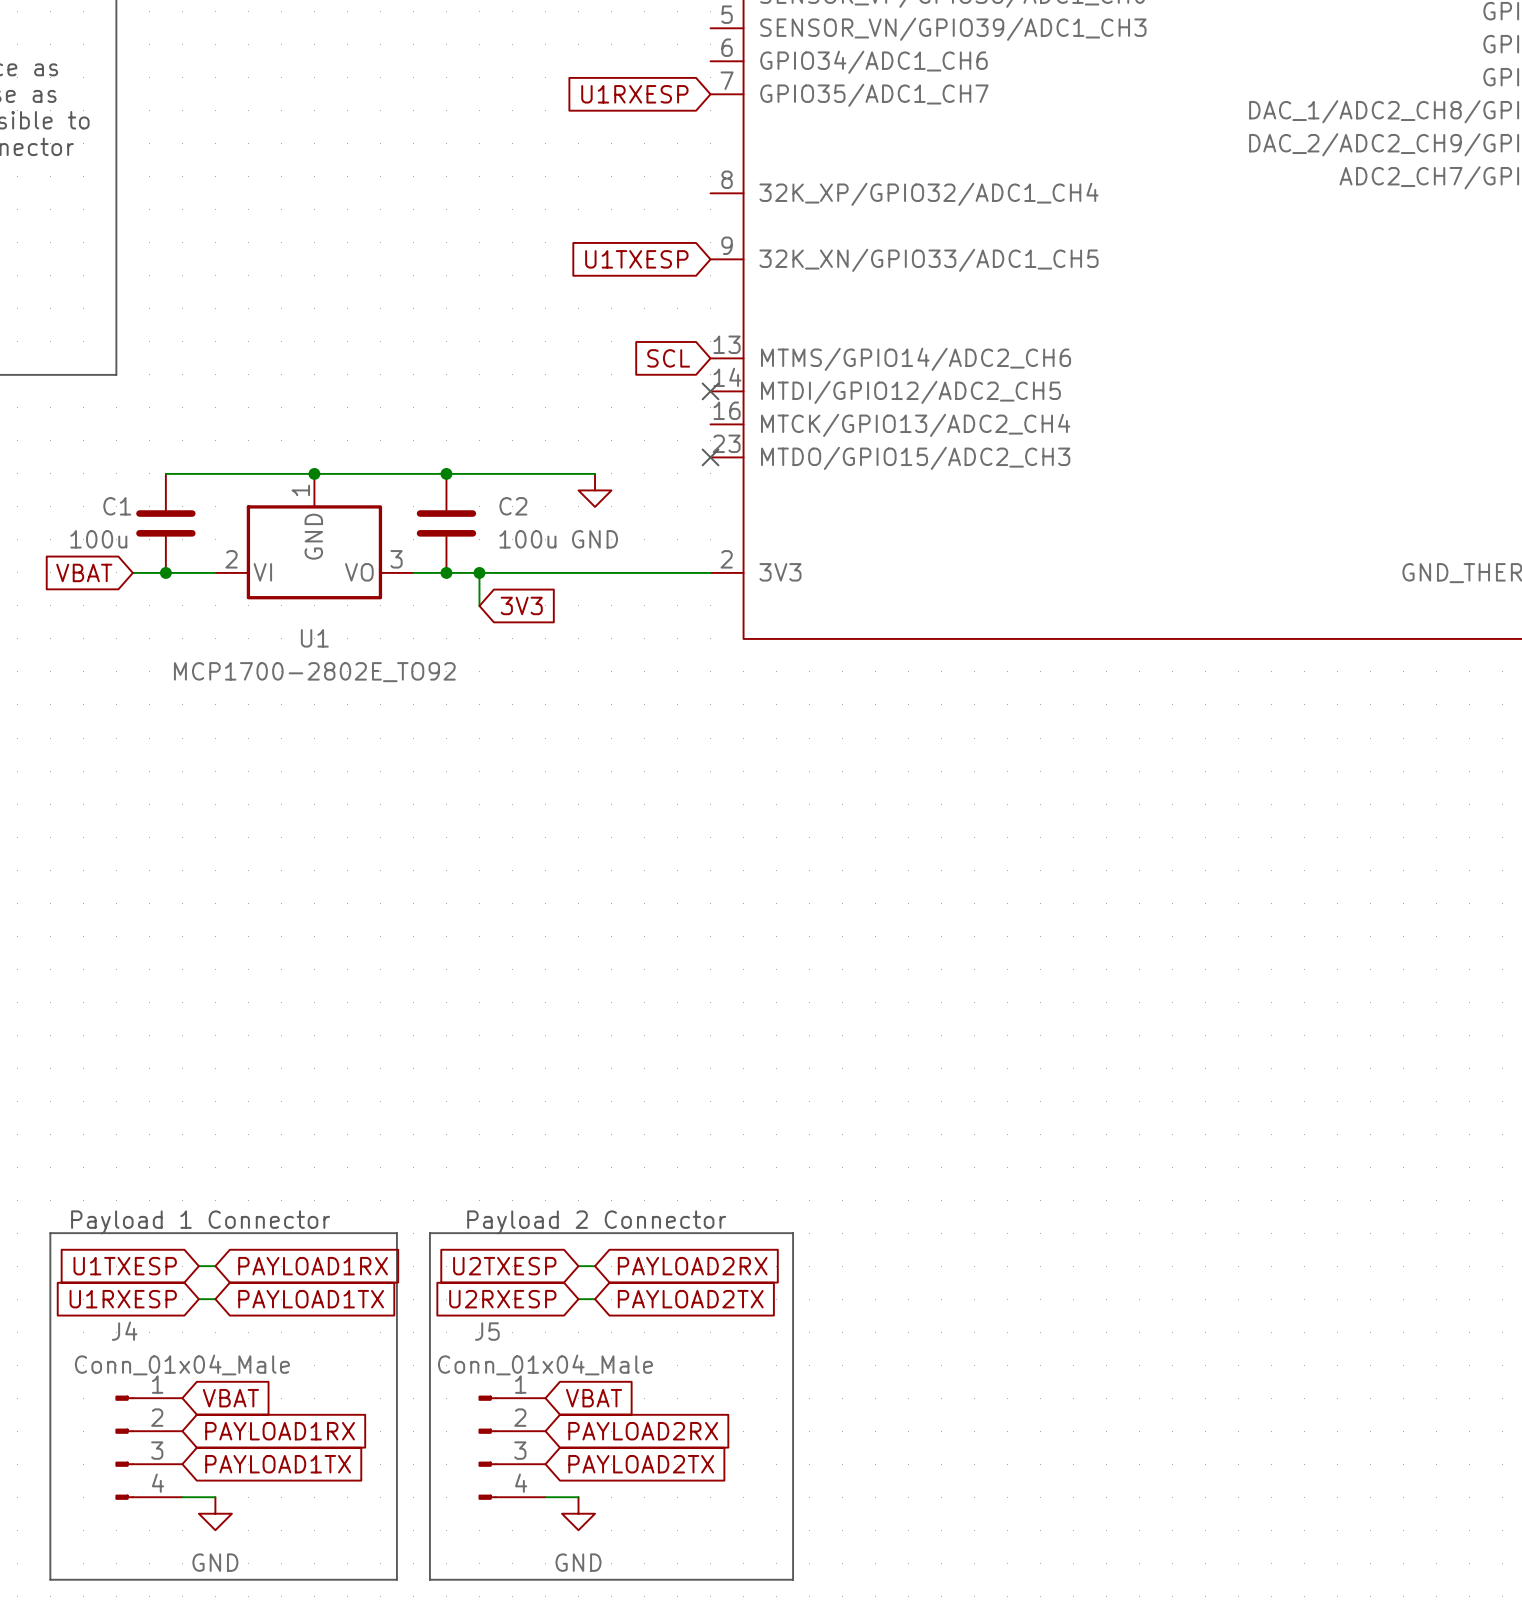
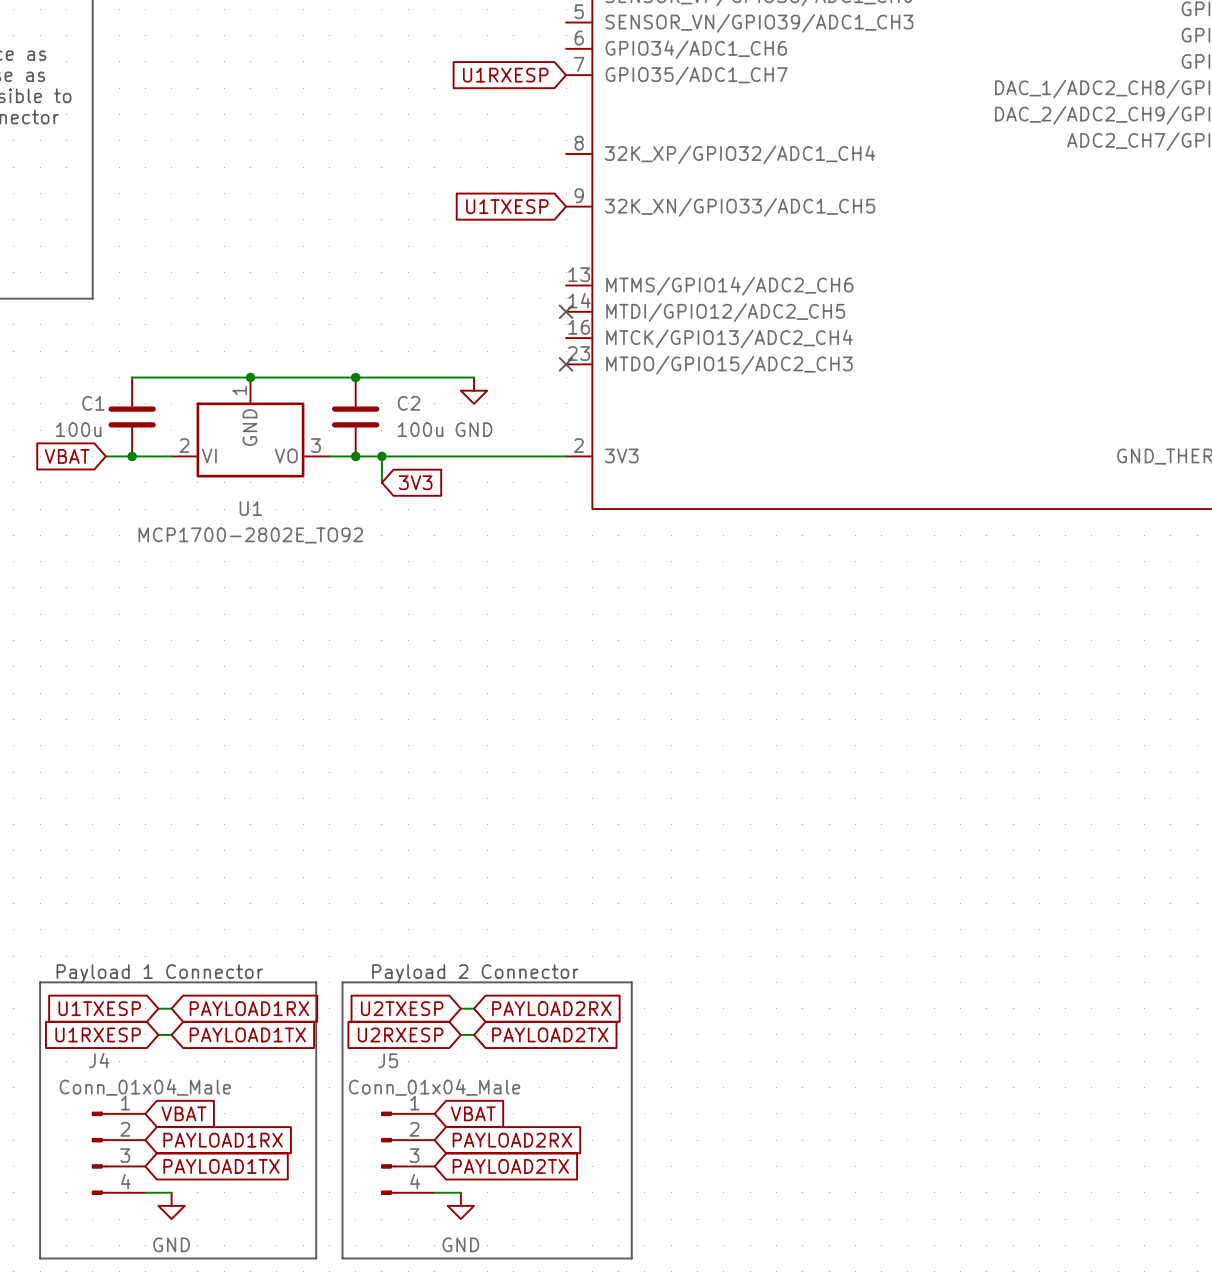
global label: SCL (668, 358) -> none

